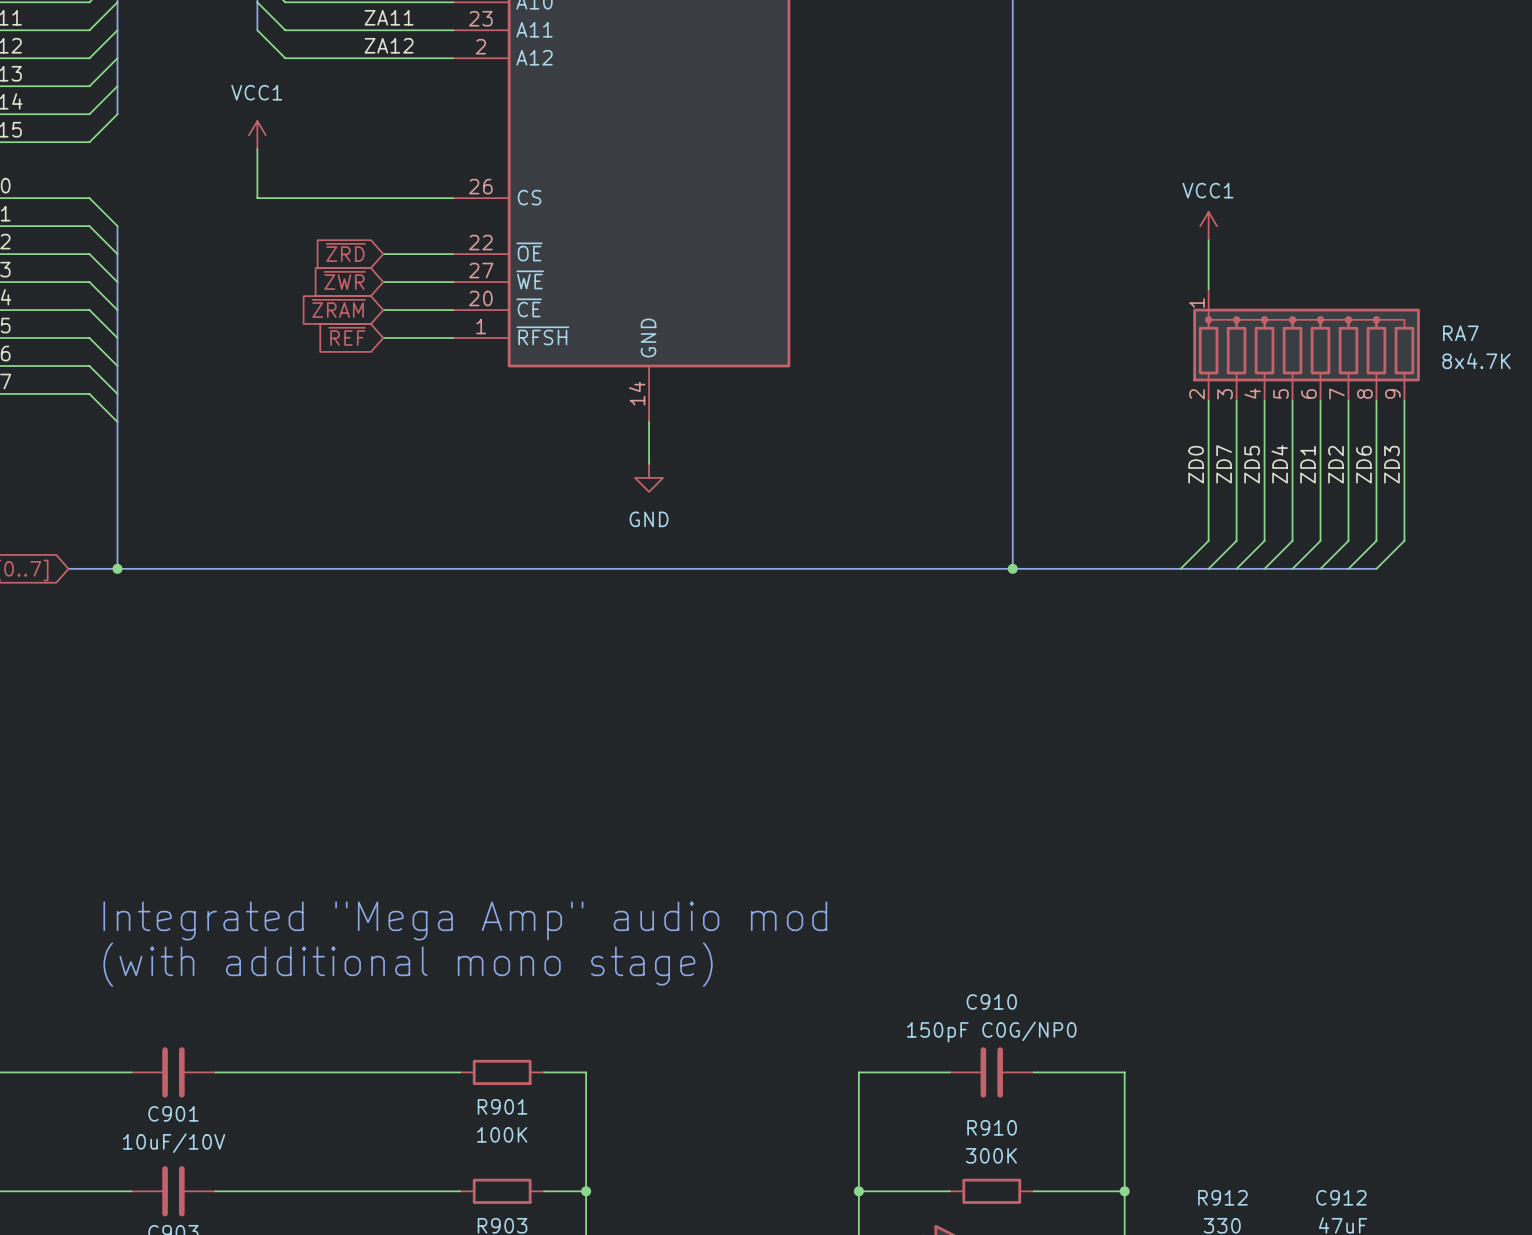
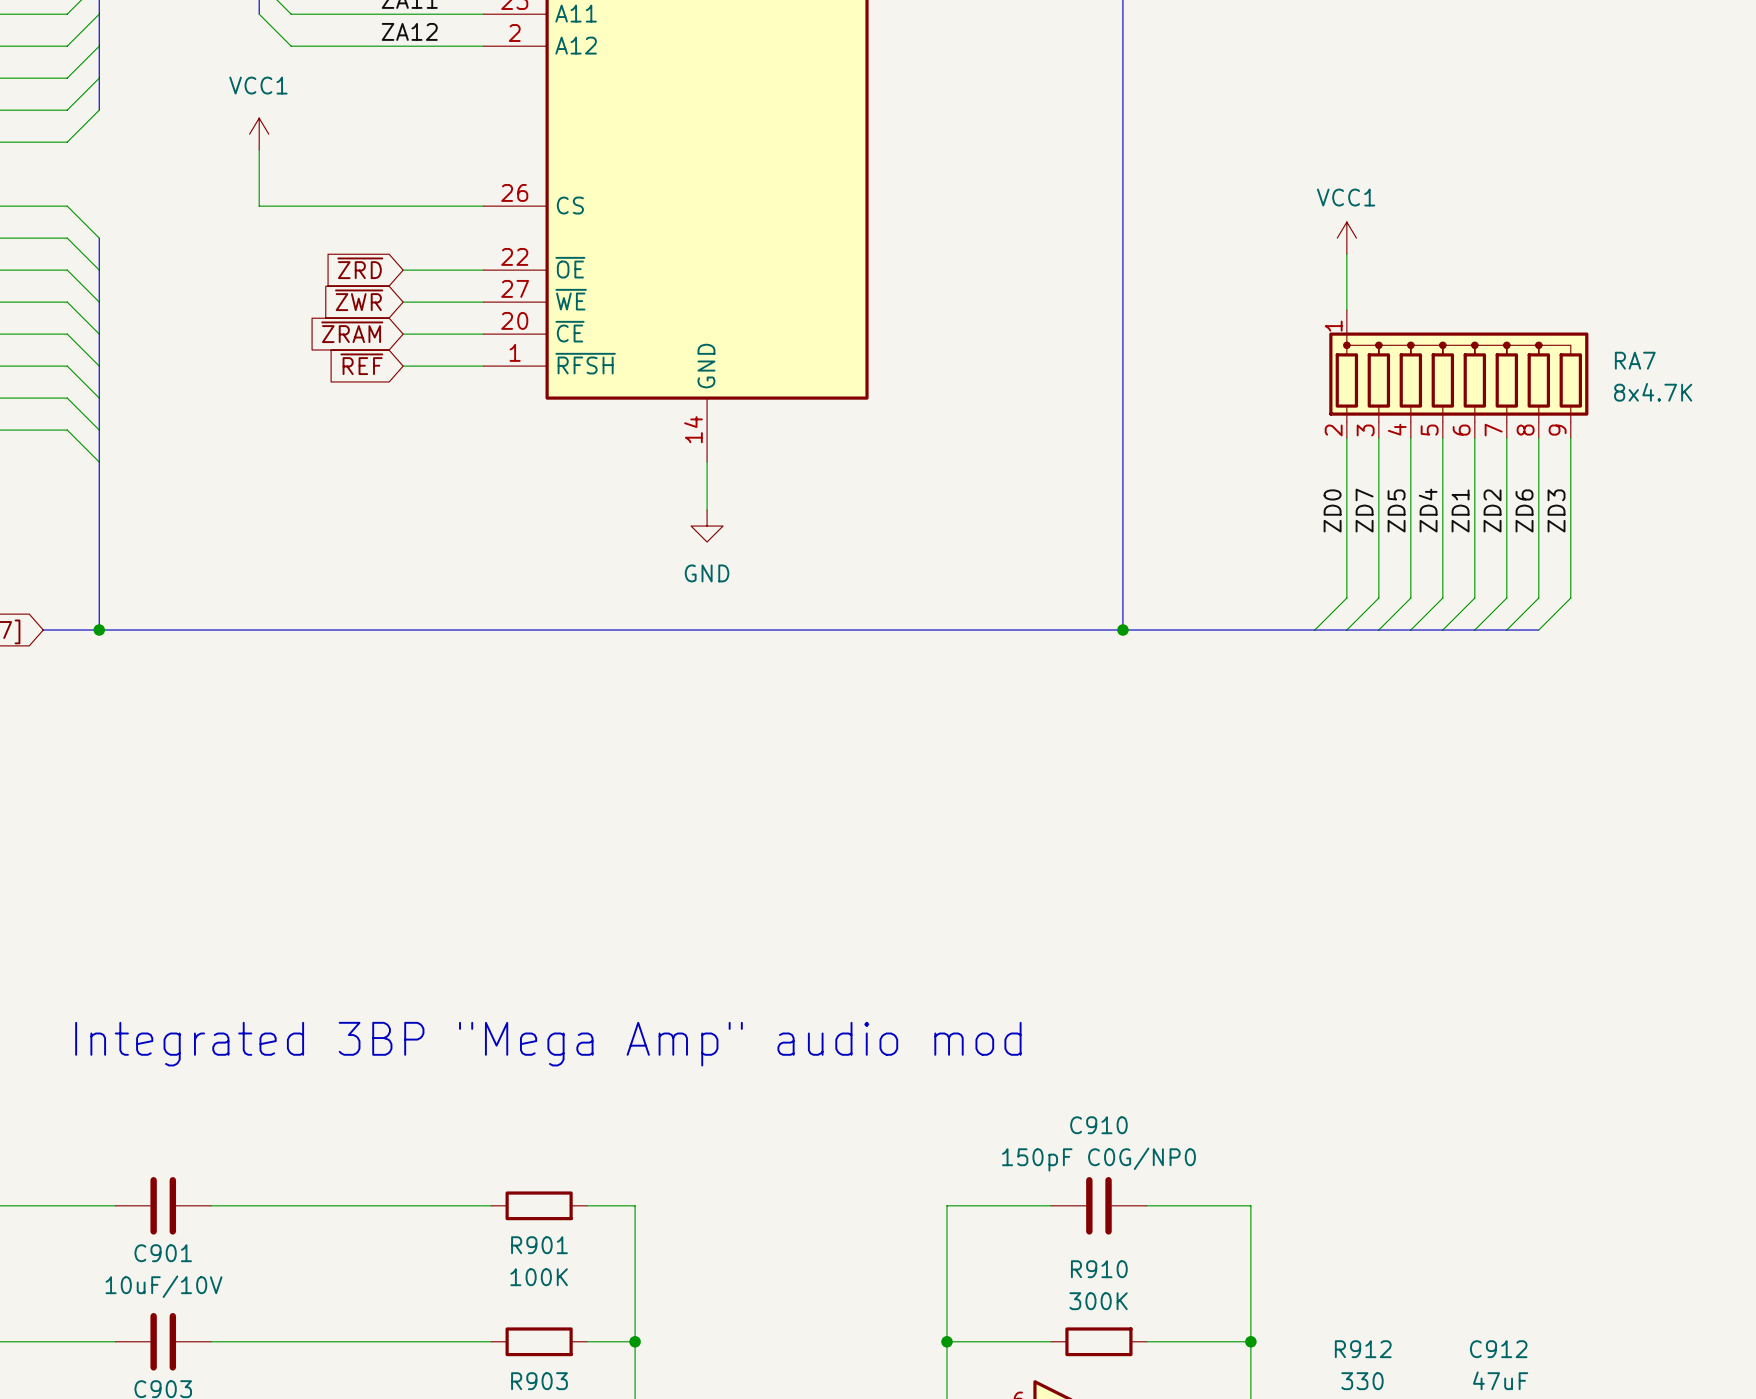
text: Integrated "Mega Amp" audio mod (465, 920) -> Integrated 3BP "Mega Amp" audio mod (548, 1044)
text: (with additional mono stage) (408, 964) -> none

